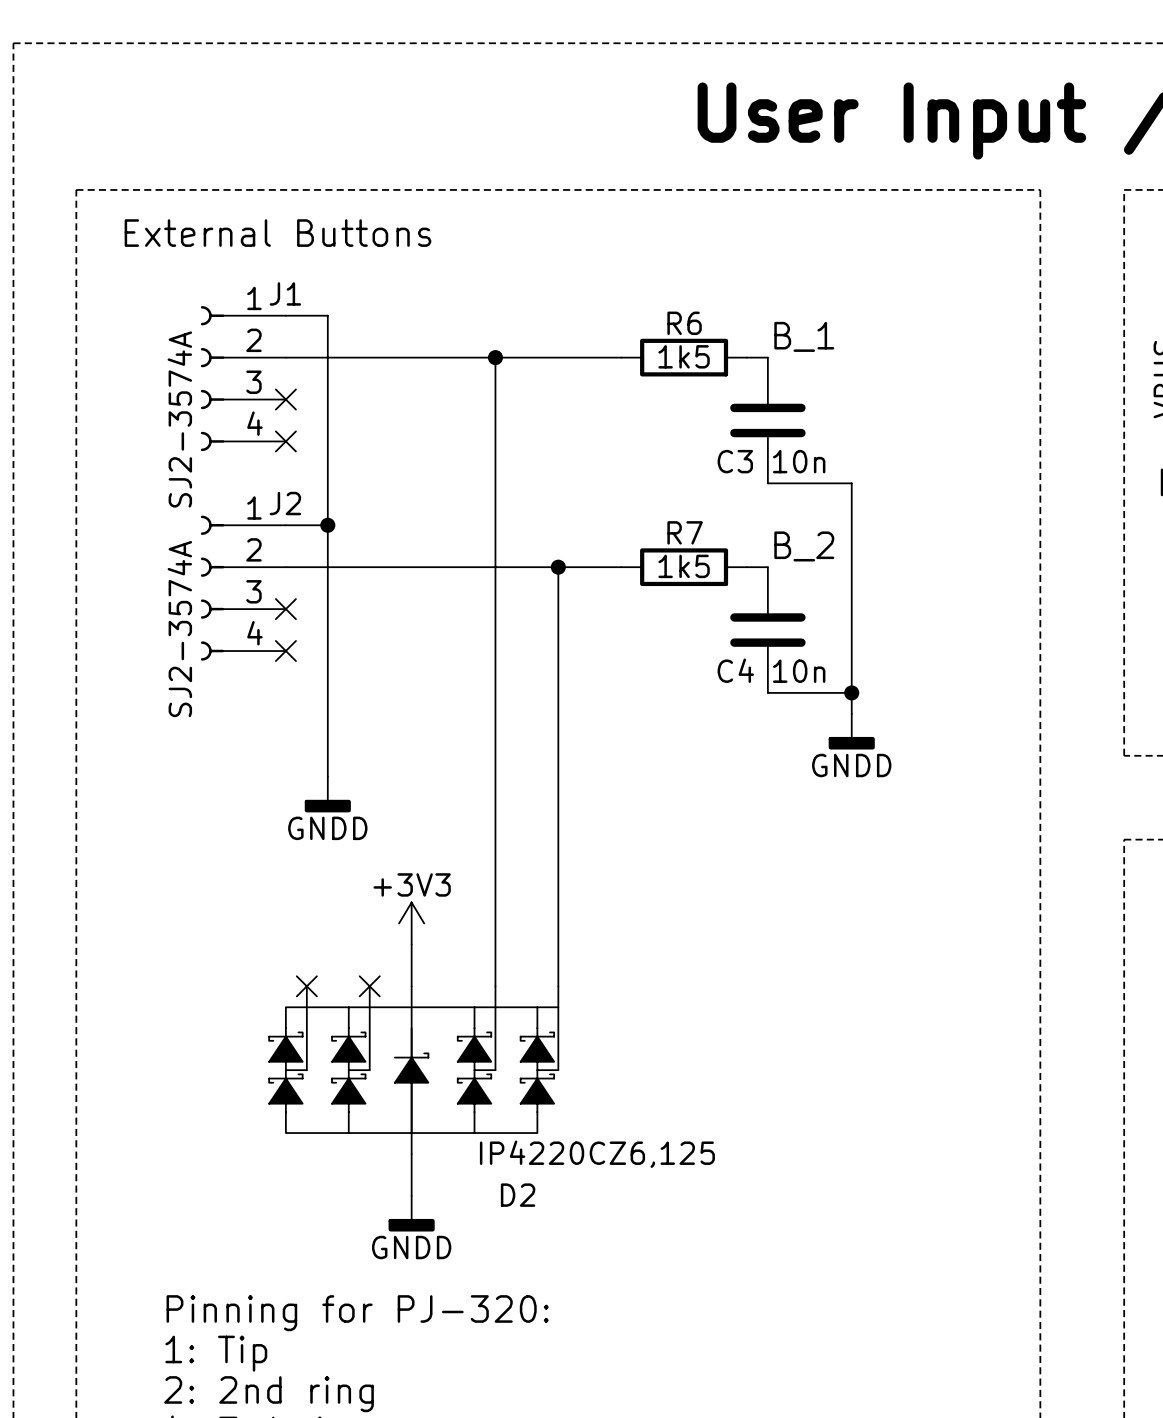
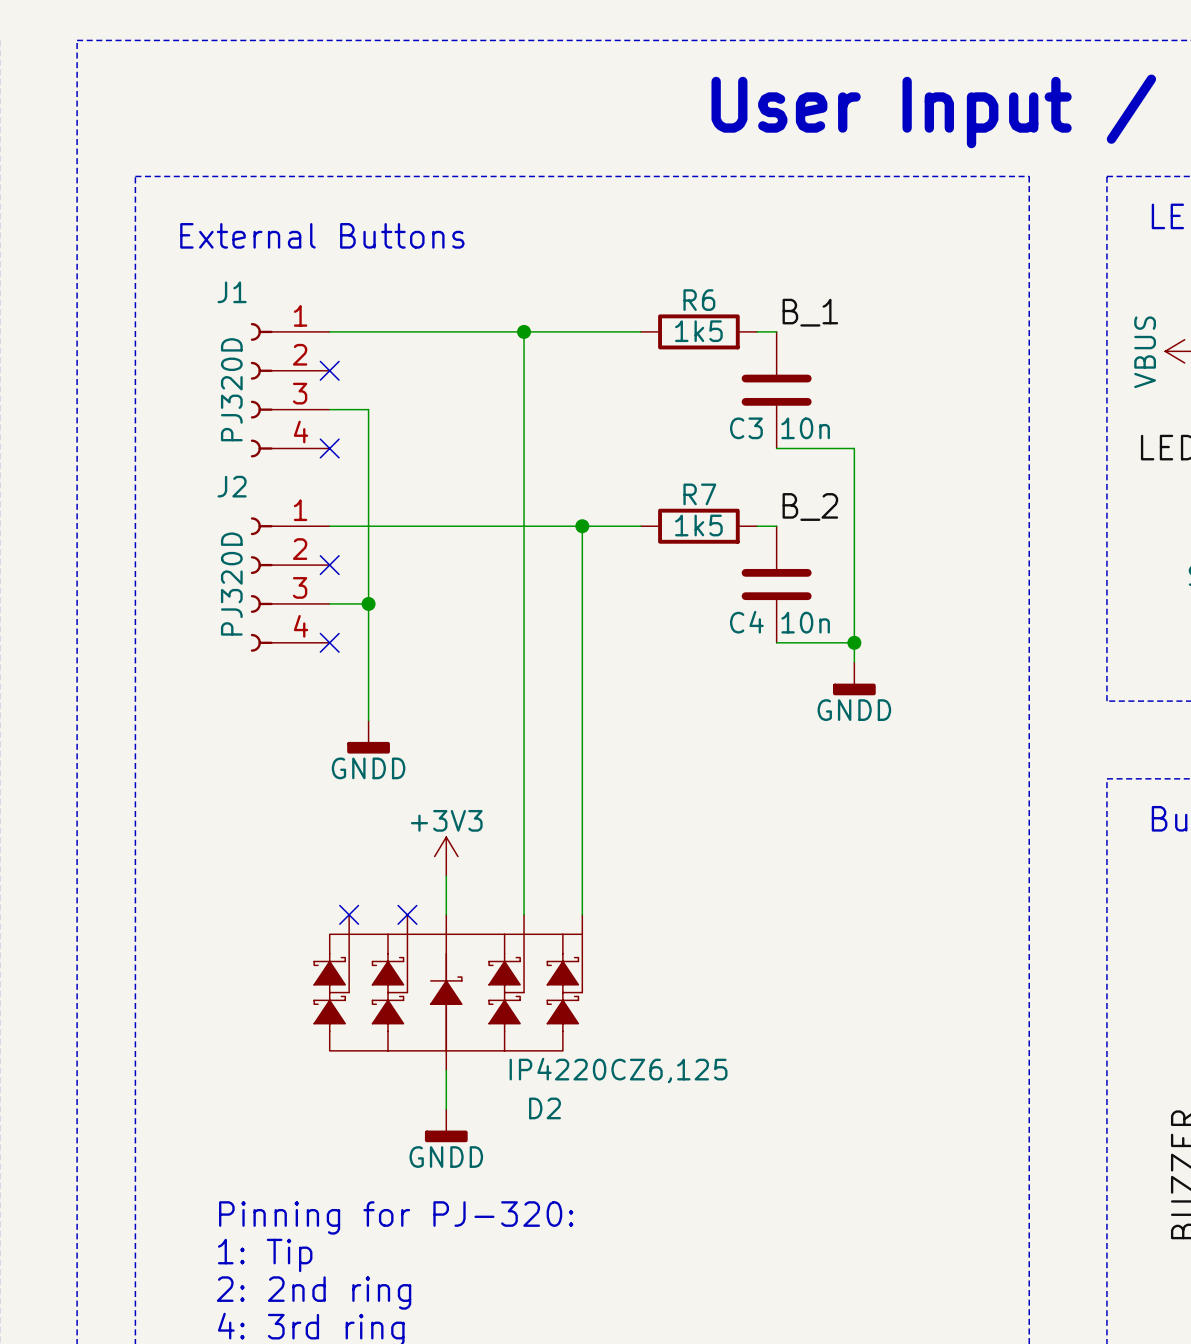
text position: External Buttons (277, 233) -> External Buttons (322, 235)
J1 name position: J1 (285, 293) -> J1 (232, 292)
wire: (285, 315) (327, 315) (327, 441) -> (329, 409) (368, 409)
J1 position: (243, 378) -> (290, 390)
J1 value: SJ2-3574A (179, 419) -> PJ320D (231, 389)
no-connect mark position: (285, 441) -> (329, 448)
J2 name position: J2 (285, 503) -> J2 (232, 486)
wire: (285, 525) (327, 525) -> (329, 603) (368, 603)
junction: (327, 525) -> none
J2 position: (243, 588) -> (290, 584)
J2 value: SJ2-3574A (179, 629) -> PJ320D (231, 584)
no-connect mark position: (285, 651) -> (329, 642)
junction: none -> (368, 603)

